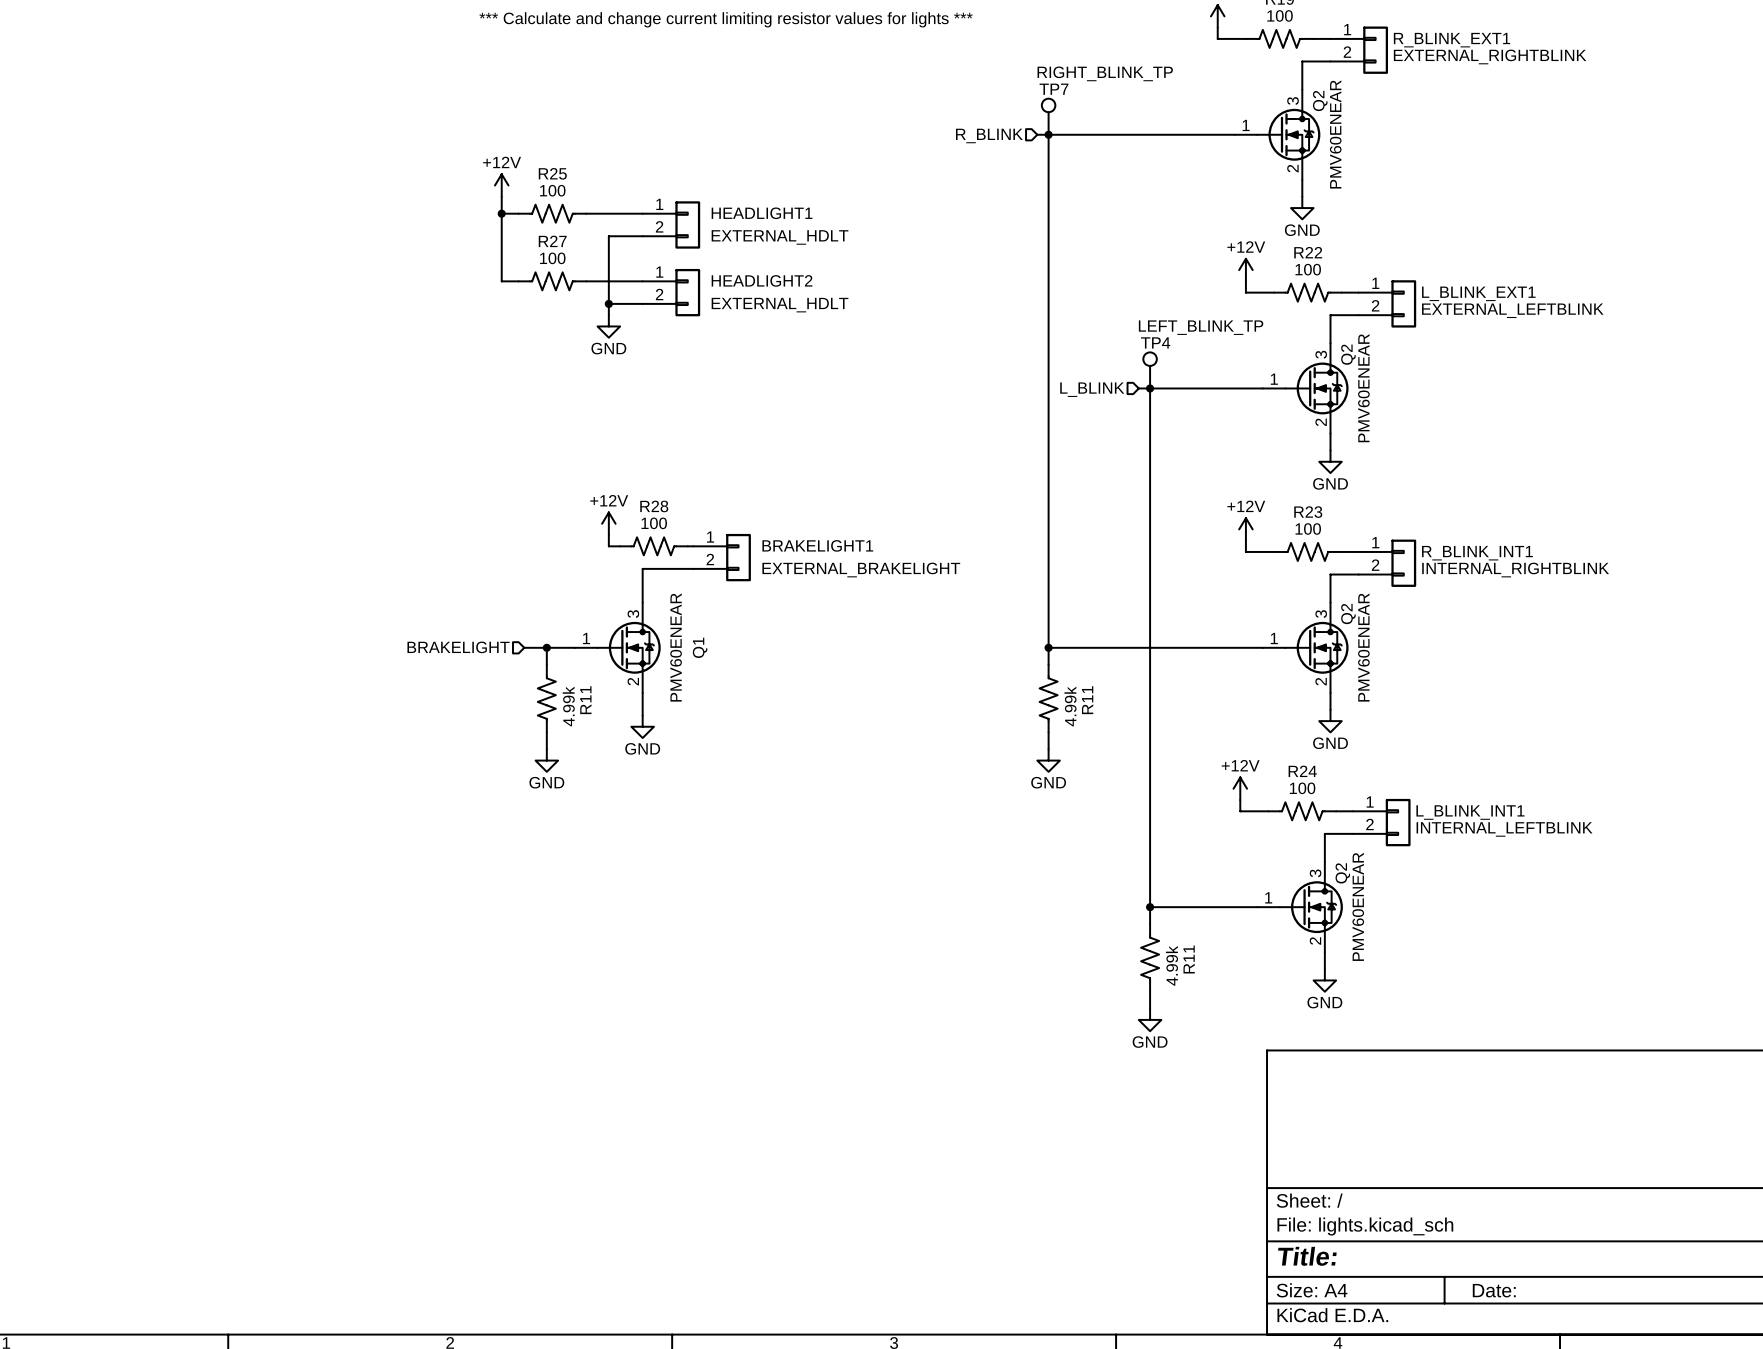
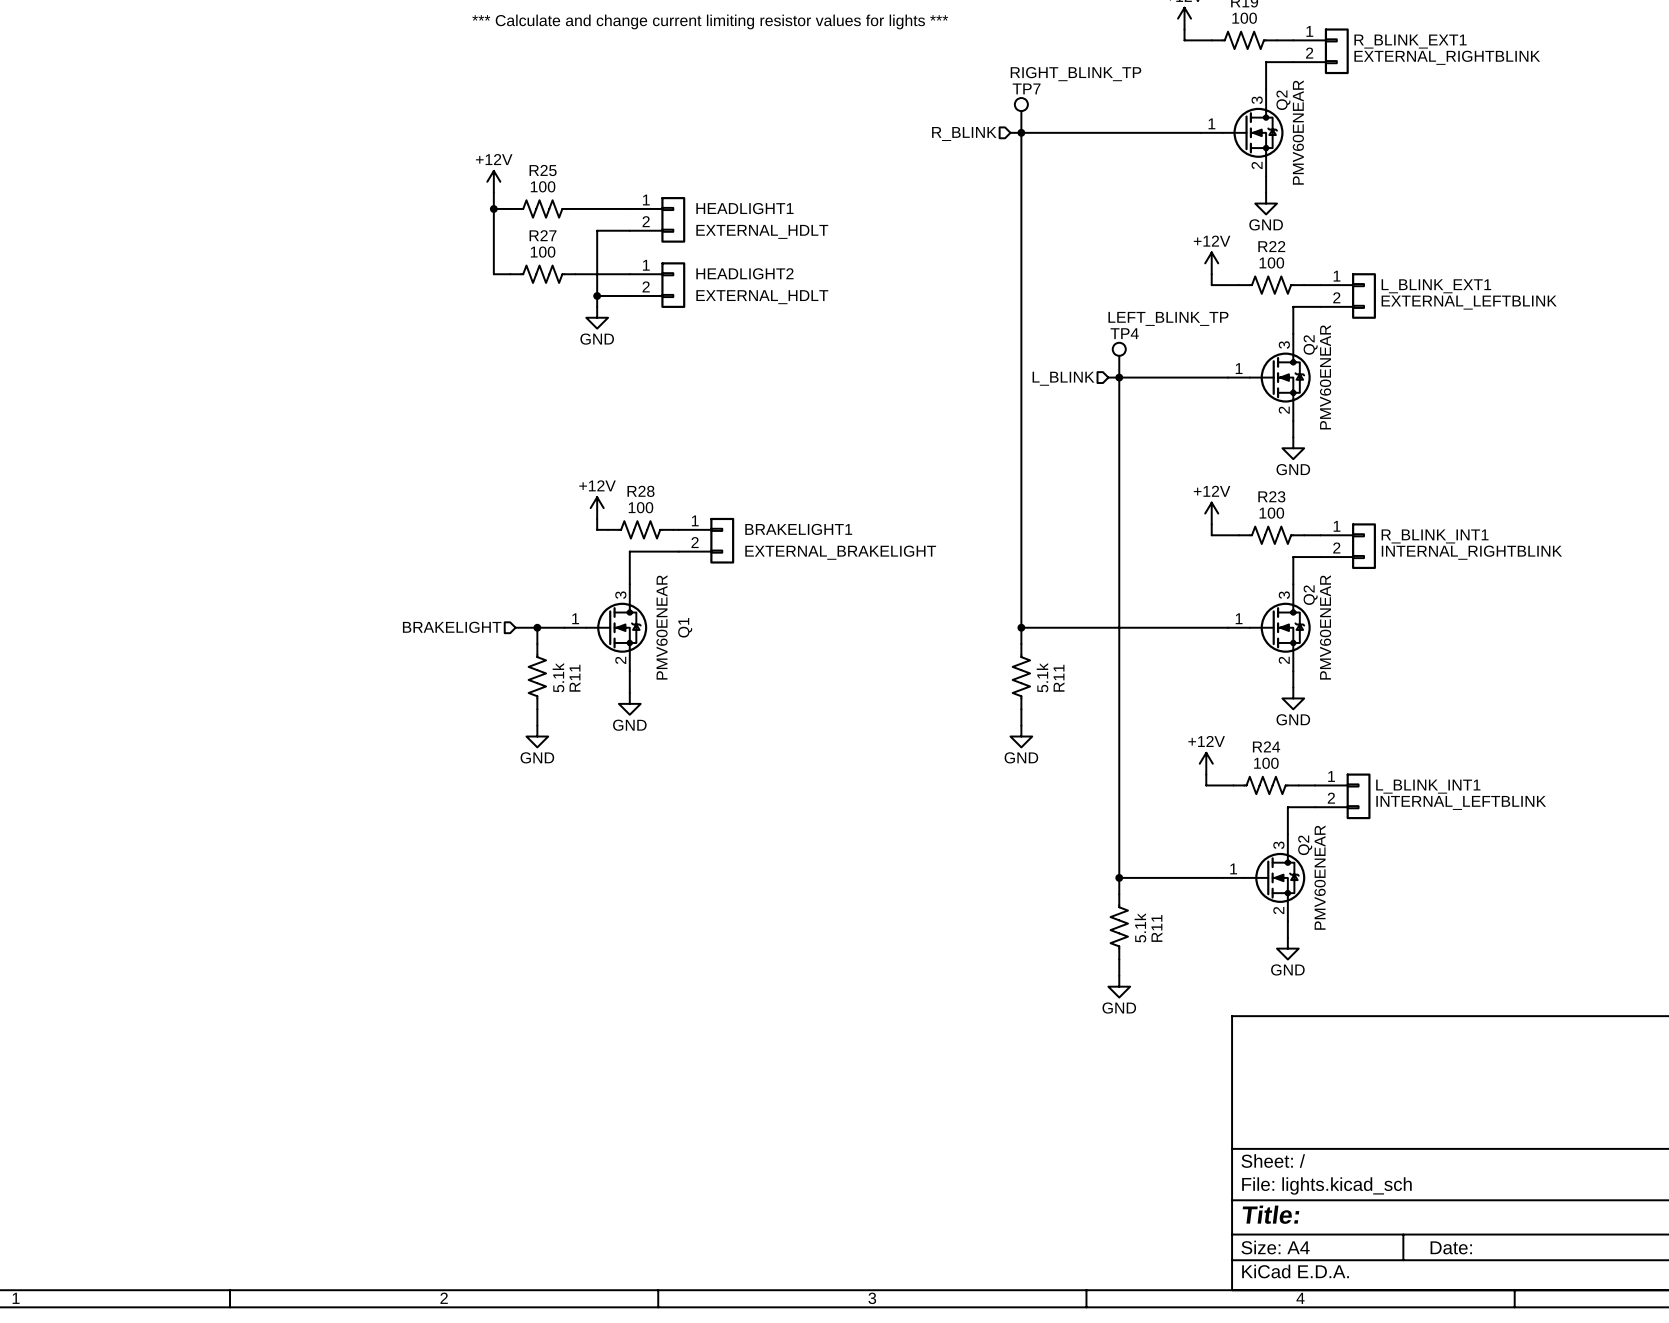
R11 value: 4.99k (568, 706) -> 5.1k (558, 677)
R11 value: 4.99k (1070, 706) -> 5.1k (1042, 677)
R11 value: 4.99k (1171, 965) -> 5.1k (1140, 927)

